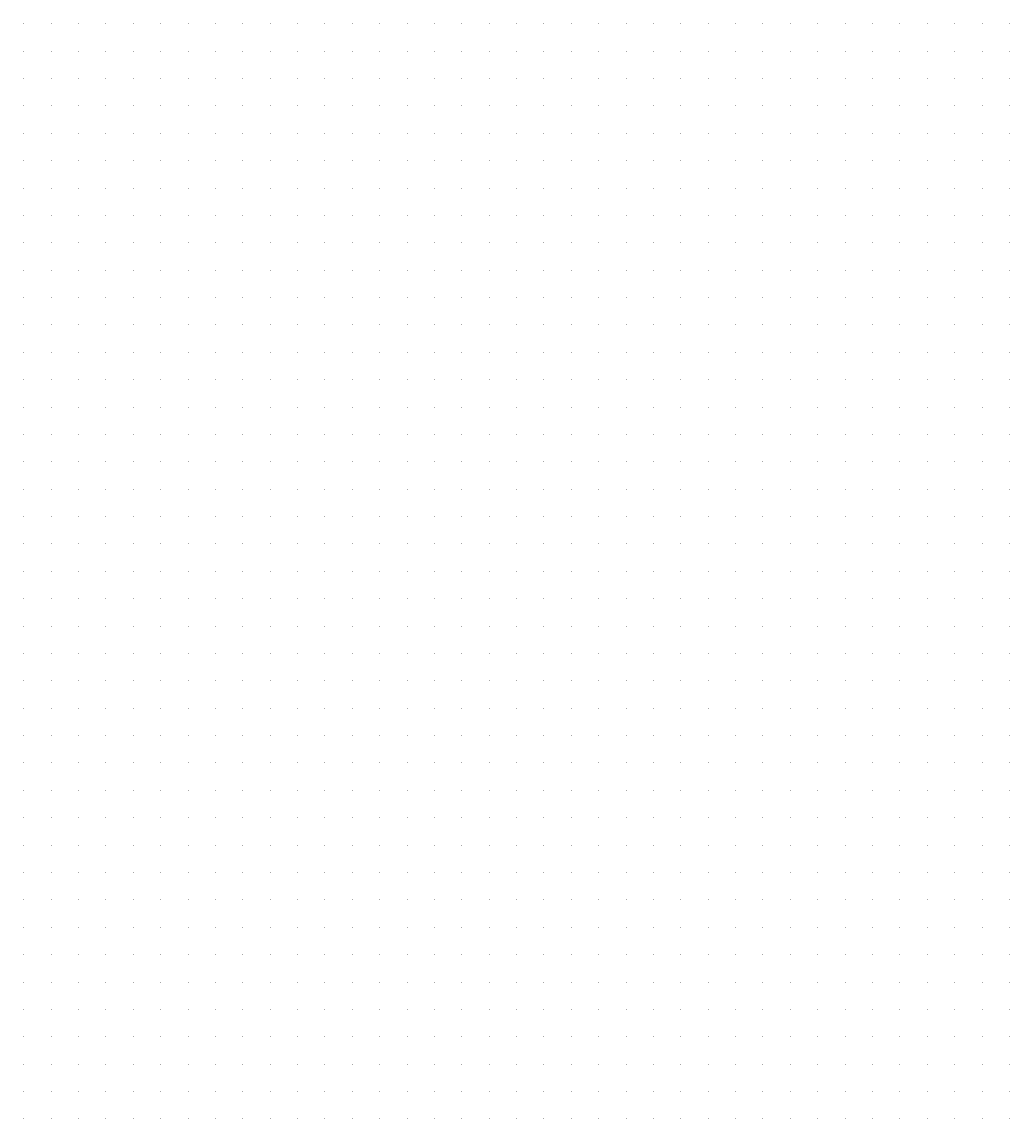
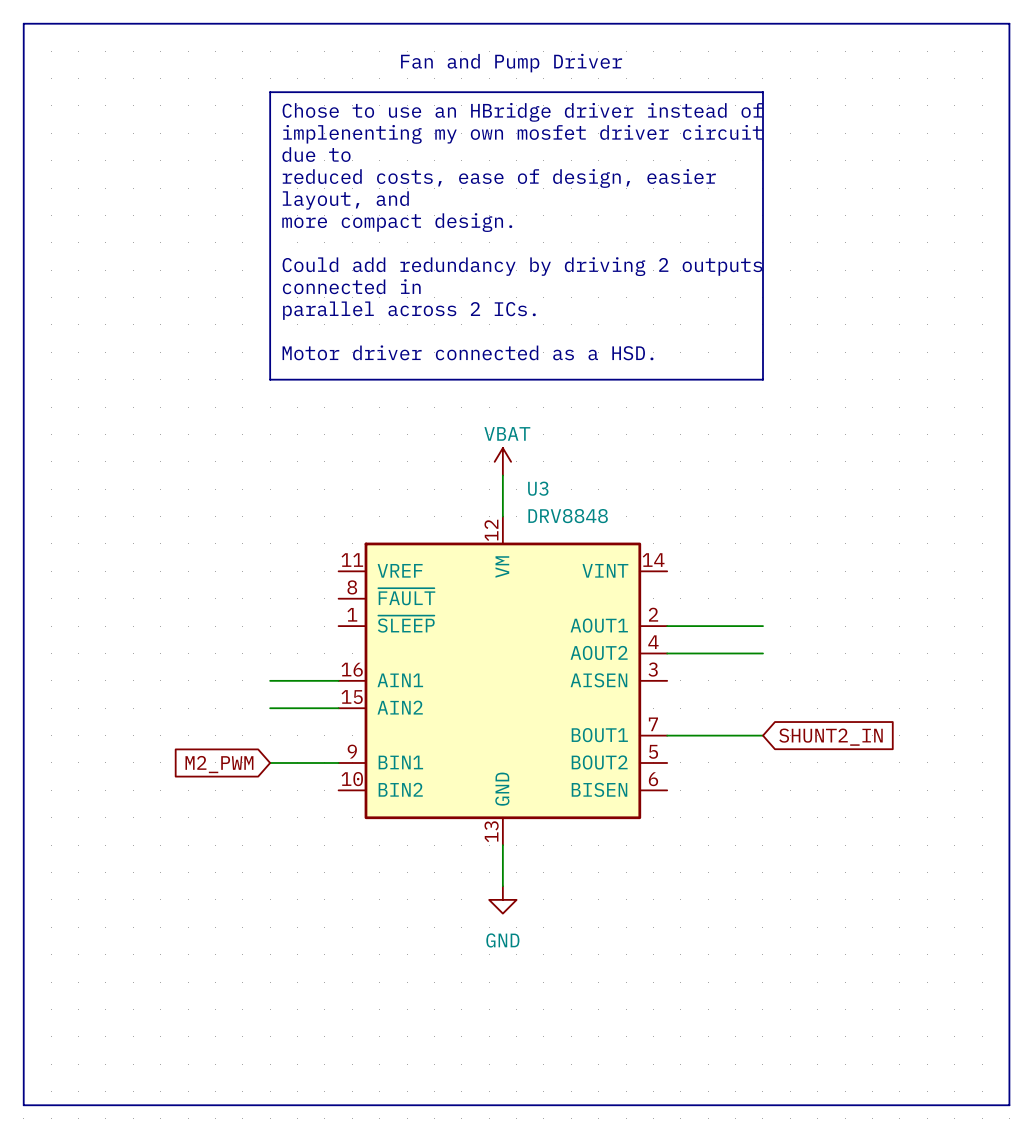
line: none -> (23, 23) (1009, 23) (1009, 1105) (23, 1105) (23, 23)
text: none -> Fan and Pump Driver (511, 63)
line: none -> (270, 92) (762, 92) (762, 379) (270, 379) (270, 92)
text: none -> Chose to use an HBridge driver instead of (522, 112)
text: none -> implenenting my own mosfet driver circuit (522, 134)
text: none -> due to (316, 154)
text: none -> reduced costs, ease of design, easier (499, 178)
text: none -> layout, and (345, 200)
text: none -> more compact design. (397, 222)
text: none -> Could add redundancy by driving 2 outputs (522, 266)
text: none -> connected in (351, 286)
text: none -> parallel across 2 ICs. (409, 310)
text: none -> Motor driver connected as a HSD. (467, 352)
power symbol: none -> VBAT (502, 461)
wire: none -> (502, 475) (502, 516)
wire: none -> (667, 626) (762, 626)
wire: none -> (667, 653) (762, 653)
wire: none -> (270, 680) (338, 680)
U3: none -> DRV8848 (502, 680)
wire: none -> (270, 708) (338, 708)
wire: none -> (667, 735) (762, 735)
global label: none -> SHUNT2_IN (831, 737)
wire: none -> (270, 762) (338, 762)
global label: none -> M2_PWM (219, 764)
wire: none -> (502, 845) (502, 886)
power symbol: none -> GND (502, 899)

